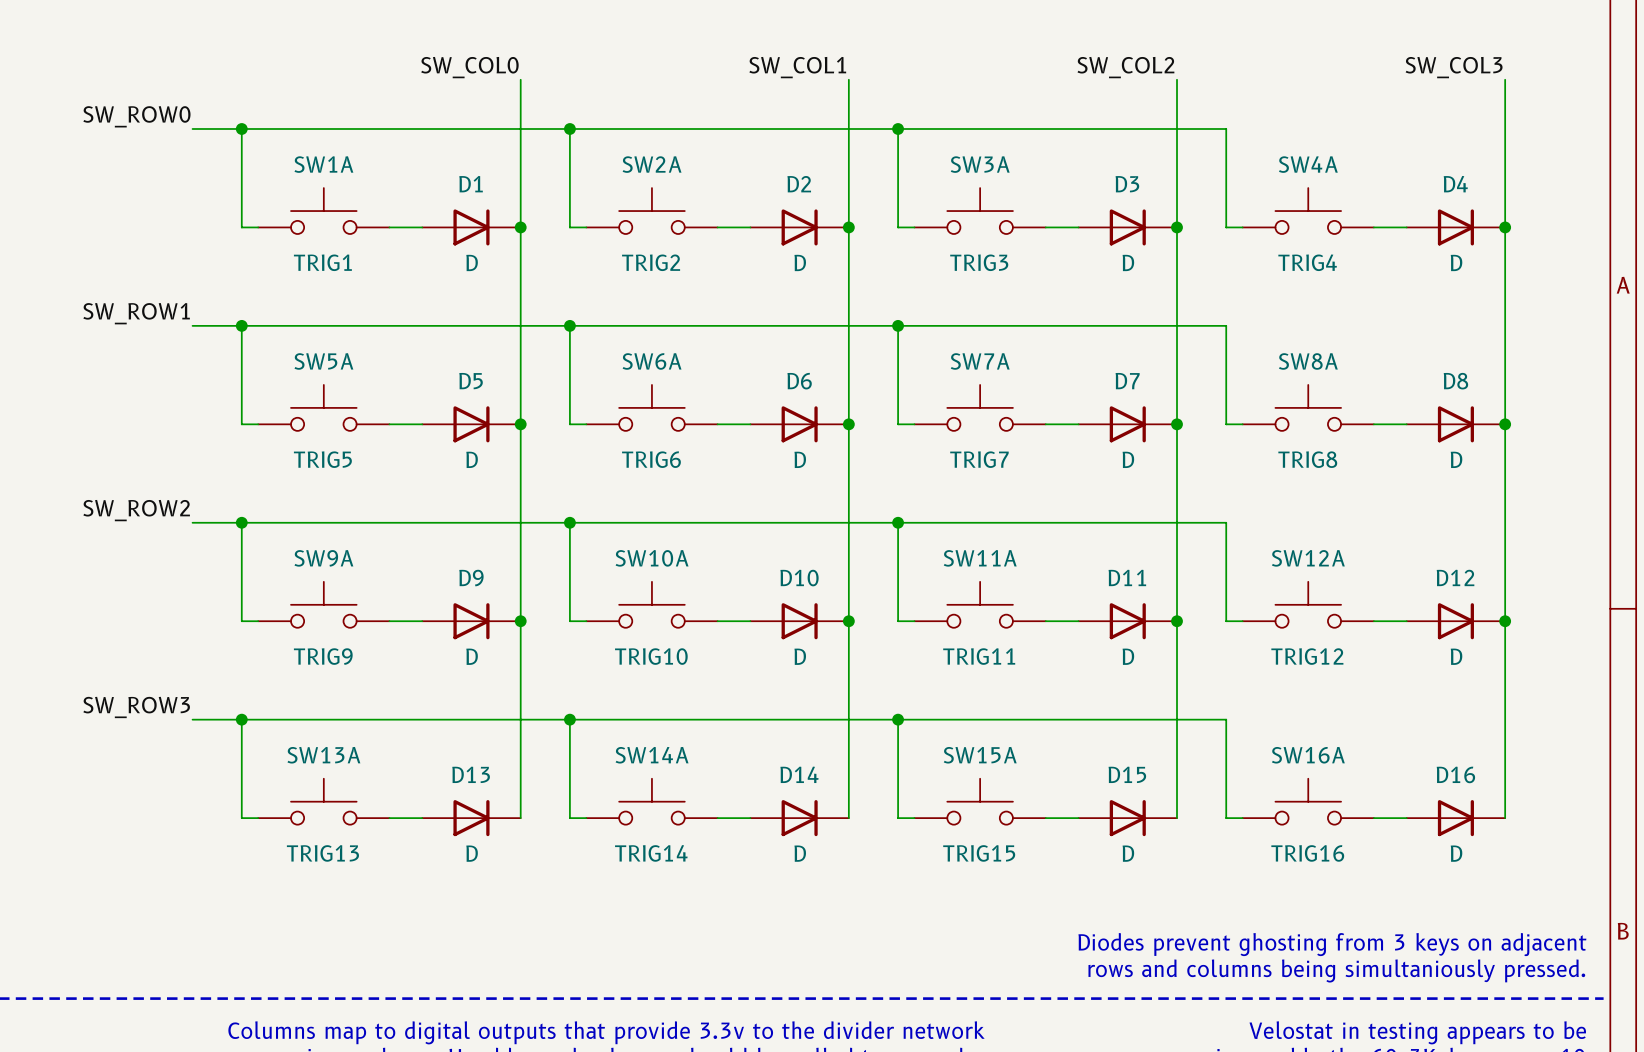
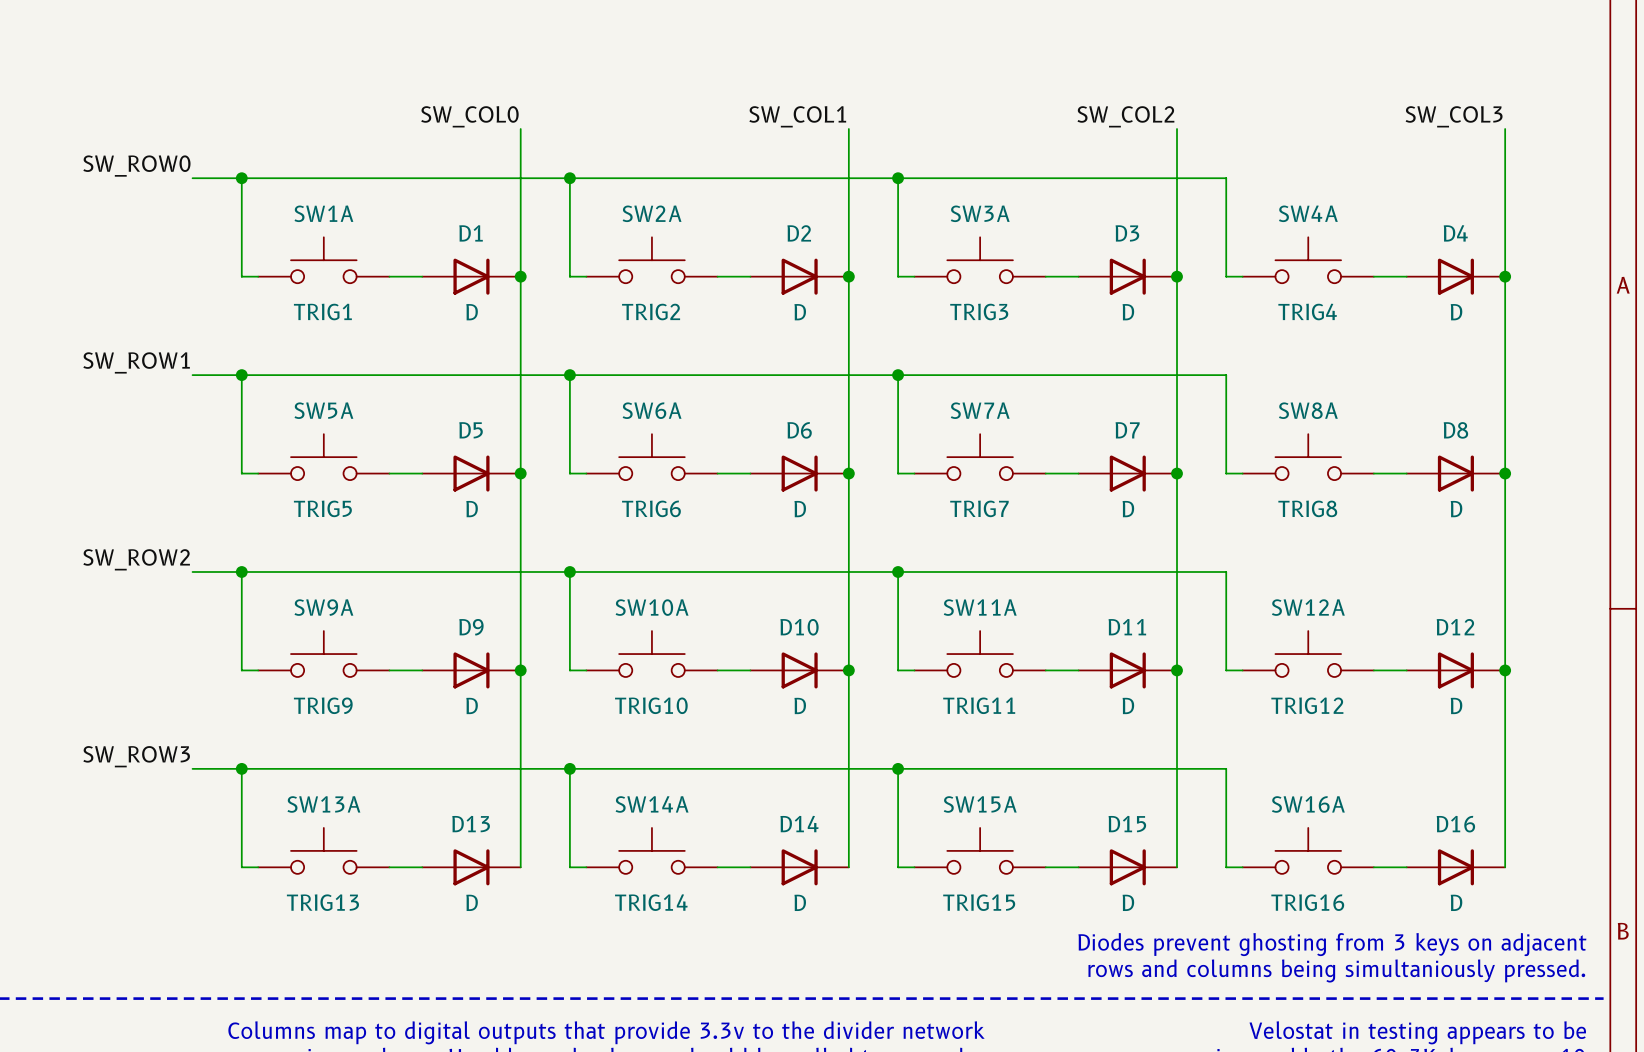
label position: SW_COL0 (469, 67) -> SW_COL0 (469, 116)
label position: SW_COL1 (797, 67) -> SW_COL1 (797, 116)
label position: SW_COL2 (1125, 67) -> SW_COL2 (1125, 116)
label position: SW_COL3 (1454, 67) -> SW_COL3 (1454, 116)
wire: (520, 79) (520, 128) -> none
wire: (848, 79) (848, 128) -> none
wire: (1177, 79) (1177, 128) -> none
wire: (1505, 79) (1505, 128) -> none
label position: SW_ROW0 (136, 116) -> SW_ROW0 (136, 166)
wire: (192, 128) (1226, 128) (1226, 178) -> (192, 178) (1226, 178)
wire: (241, 128) (241, 178) -> none
junction position: (241, 128) -> (241, 178)
wire: (569, 128) (569, 178) -> none
junction: (569, 128) -> none
wire: (898, 128) (898, 178) -> none
junction: (898, 128) -> none
junction: none -> (569, 178)
junction: none -> (898, 178)
SW1A position: (323, 211) -> (323, 260)
SW2A position: (651, 211) -> (651, 260)
SW3A position: (980, 211) -> (980, 260)
SW4A position: (1308, 211) -> (1308, 260)
wire: (241, 227) (258, 227) -> (241, 227) (241, 276) (258, 276)
wire: (389, 227) (422, 227) -> (389, 276) (422, 276)
D1 position: (471, 227) -> (471, 276)
junction: (520, 227) -> none
wire: (569, 227) (586, 227) -> (569, 227) (569, 276) (586, 276)
wire: (717, 227) (750, 227) -> (717, 276) (750, 276)
D2 position: (799, 227) -> (799, 276)
junction: (848, 227) -> none
wire: (898, 227) (914, 227) -> (898, 227) (898, 276) (914, 276)
wire: (1045, 227) (1078, 227) -> (1045, 276) (1078, 276)
D3 position: (1127, 227) -> (1127, 276)
junction position: (1177, 227) -> (1177, 276)
wire: (1226, 227) (1242, 227) -> (1226, 227) (1226, 276) (1242, 276)
wire: (1373, 227) (1406, 227) -> (1373, 276) (1406, 276)
D4 position: (1455, 227) -> (1455, 276)
junction position: (1505, 227) -> (1505, 276)
junction: none -> (520, 276)
junction: none -> (848, 276)
label position: SW_ROW1 (136, 313) -> SW_ROW1 (136, 362)
wire: (192, 325) (1226, 325) (1226, 375) -> (192, 375) (1226, 375)
wire: (241, 325) (241, 375) -> none
junction position: (241, 325) -> (241, 375)
wire: (569, 325) (569, 375) -> none
junction: (569, 325) -> none
wire: (898, 325) (898, 375) -> none
junction: (898, 325) -> none
junction: none -> (569, 375)
junction: none -> (898, 375)
SW5A position: (323, 407) -> (323, 457)
SW6A position: (651, 407) -> (651, 457)
SW7A position: (980, 407) -> (980, 457)
SW8A position: (1308, 407) -> (1308, 457)
wire: (241, 424) (258, 424) -> (241, 424) (241, 473) (258, 473)
wire: (389, 424) (422, 424) -> (389, 473) (422, 473)
D5 position: (471, 424) -> (471, 473)
junction: (520, 424) -> none
wire: (569, 424) (586, 424) -> (569, 424) (569, 473) (586, 473)
wire: (717, 424) (750, 424) -> (717, 473) (750, 473)
D6 position: (799, 424) -> (799, 473)
junction: (848, 424) -> none
wire: (898, 424) (914, 424) -> (898, 424) (898, 473) (914, 473)
wire: (1045, 424) (1078, 424) -> (1045, 473) (1078, 473)
D7 position: (1127, 424) -> (1127, 473)
junction position: (1177, 424) -> (1177, 473)
wire: (1226, 424) (1242, 424) -> (1226, 424) (1226, 473) (1242, 473)
wire: (1373, 424) (1406, 424) -> (1373, 473) (1406, 473)
D8 position: (1455, 424) -> (1455, 473)
junction position: (1505, 424) -> (1505, 473)
junction: none -> (520, 473)
junction: none -> (848, 473)
label position: SW_ROW2 (136, 510) -> SW_ROW2 (136, 559)
wire: (192, 522) (1226, 522) (1226, 571) -> (192, 571) (1226, 571)
wire: (241, 522) (241, 571) -> none
junction position: (241, 522) -> (241, 571)
wire: (569, 522) (569, 571) -> none
junction: (569, 522) -> none
wire: (898, 522) (898, 571) -> none
junction: (898, 522) -> none
junction: none -> (569, 571)
junction: none -> (898, 571)
SW9A position: (323, 604) -> (323, 654)
SW10A position: (651, 604) -> (651, 654)
SW11A position: (980, 604) -> (980, 654)
SW12A position: (1308, 604) -> (1308, 654)
wire: (241, 621) (258, 621) -> (241, 621) (241, 670) (258, 670)
wire: (389, 621) (422, 621) -> (389, 670) (422, 670)
D9 position: (471, 621) -> (471, 670)
junction: (520, 621) -> none
wire: (569, 621) (586, 621) -> (569, 621) (569, 670) (586, 670)
wire: (717, 621) (750, 621) -> (717, 670) (750, 670)
D10 position: (799, 621) -> (799, 670)
junction: (848, 621) -> none
wire: (898, 621) (914, 621) -> (898, 621) (898, 670) (914, 670)
wire: (1045, 621) (1078, 621) -> (1045, 670) (1078, 670)
D11 position: (1127, 621) -> (1127, 670)
junction position: (1177, 621) -> (1177, 670)
wire: (1226, 621) (1242, 621) -> (1226, 621) (1226, 670) (1242, 670)
wire: (1373, 621) (1406, 621) -> (1373, 670) (1406, 670)
D12 position: (1455, 621) -> (1455, 670)
junction position: (1505, 621) -> (1505, 670)
junction: none -> (520, 670)
junction: none -> (848, 670)
label position: SW_ROW3 (136, 707) -> SW_ROW3 (136, 756)
wire: (192, 719) (1226, 719) (1226, 768) -> (192, 768) (1226, 768)
wire: (241, 719) (241, 768) -> (520, 818) (520, 867)
junction position: (241, 719) -> (241, 768)
wire: (569, 719) (569, 768) -> (848, 818) (848, 867)
junction: (569, 719) -> none
wire: (898, 719) (898, 768) -> (1177, 818) (1177, 867)
junction: (898, 719) -> none
junction: none -> (569, 768)
junction: none -> (898, 768)
SW13A position: (323, 801) -> (323, 850)
SW14A position: (651, 801) -> (651, 850)
SW15A position: (980, 801) -> (980, 850)
SW16A position: (1308, 801) -> (1308, 850)
wire: (241, 818) (258, 818) -> (241, 818) (241, 867) (258, 867)
wire: (389, 818) (422, 818) -> (389, 867) (422, 867)
D13 position: (471, 818) -> (471, 867)
wire: (569, 818) (586, 818) -> (569, 818) (569, 867) (586, 867)
wire: (717, 818) (750, 818) -> (717, 867) (750, 867)
D14 position: (799, 818) -> (799, 867)
wire: (898, 818) (914, 818) -> (898, 818) (898, 867) (914, 867)
wire: (1045, 818) (1078, 818) -> (1045, 867) (1078, 867)
D15 position: (1127, 818) -> (1127, 867)
wire: (1226, 818) (1242, 818) -> (1226, 818) (1226, 867) (1242, 867)
wire: (1373, 818) (1406, 818) -> (1373, 867) (1406, 867)
D16 position: (1455, 818) -> (1455, 867)
wire: none -> (1505, 818) (1505, 867)

